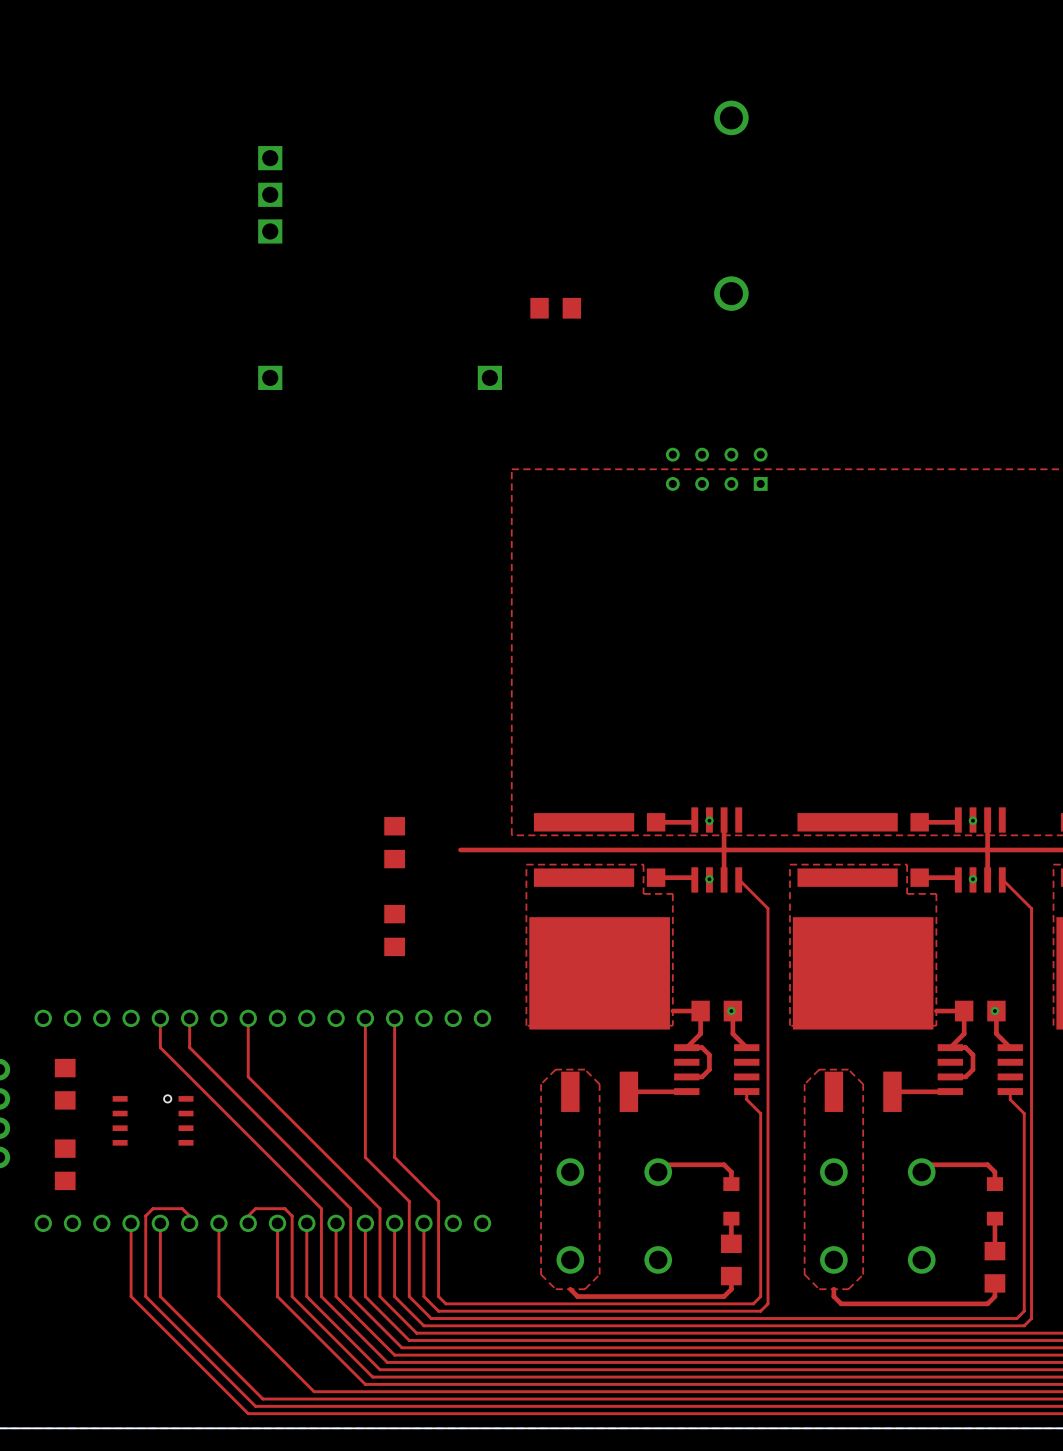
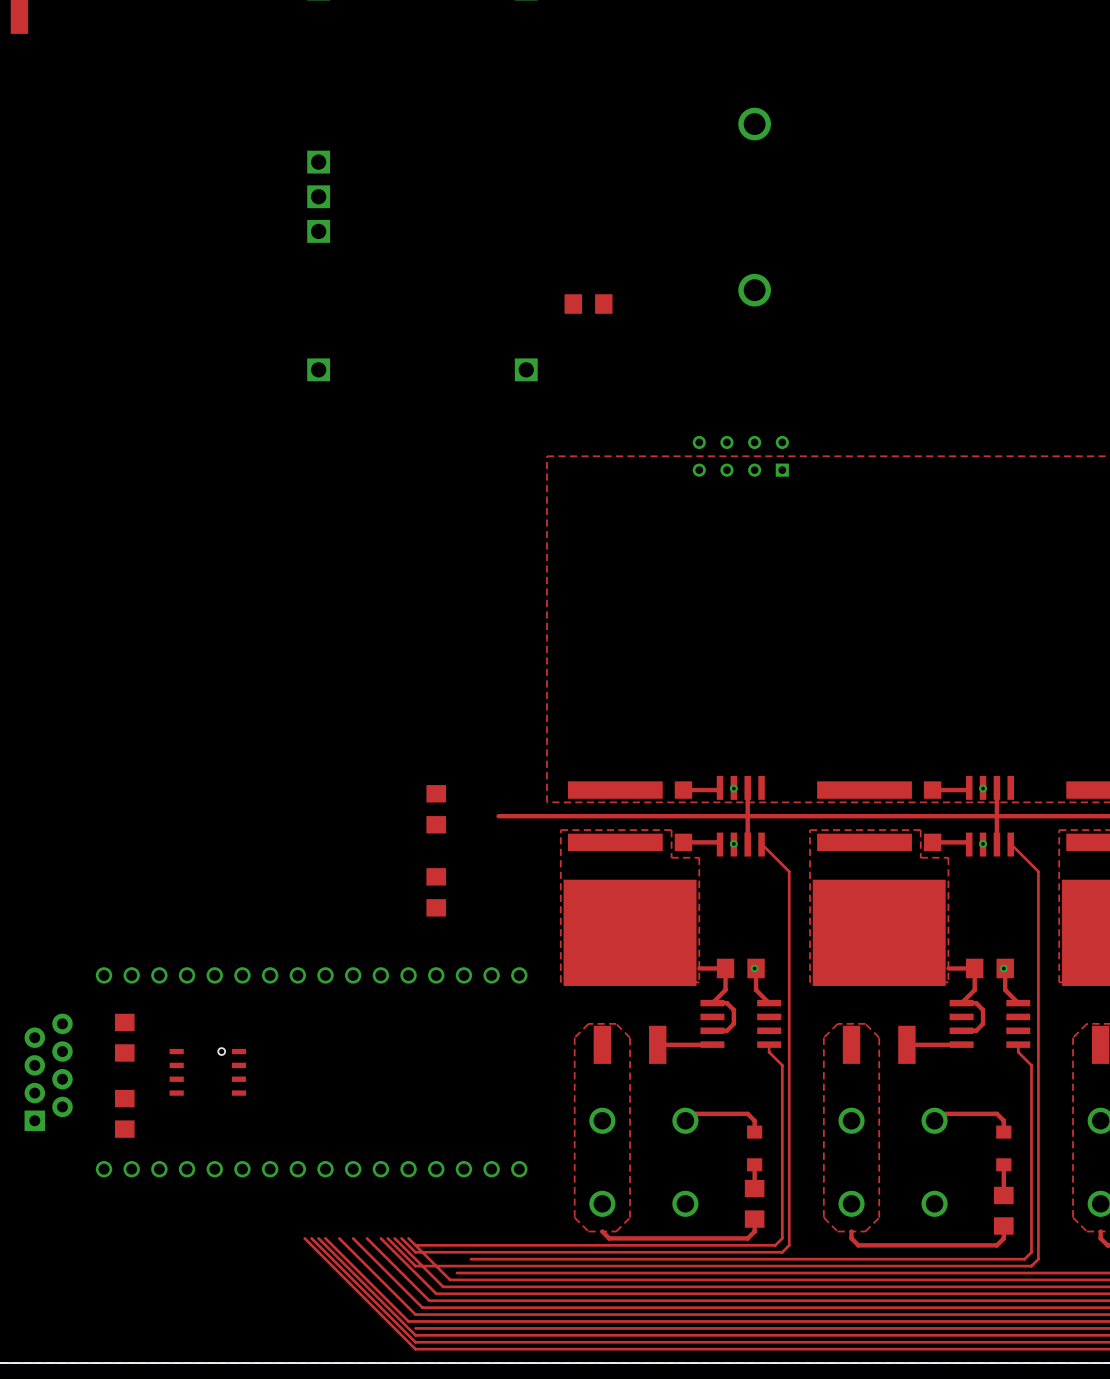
top track: (160, 1018) (160, 1047) (321, 1208) (321, 1296) -> none
top track: (189, 1018) (189, 1047) (350, 1208) (350, 1296) -> none
top track: (248, 1018) (248, 1076) (380, 1208) (380, 1296) (416, 1333) -> none
top track: (365, 1018) (365, 1157) (409, 1201) (409, 1296) (431, 1318) -> none
top track: (394, 1018) (394, 1157) (438, 1201) (438, 1296) (445, 1303) -> (415, 1245) (484, 1245)
top track: (131, 1223) (131, 1296) (248, 1413) (372, 1413) -> (304, 1238) (415, 1349)
top track: (160, 1223) (160, 1296) (262, 1399) (372, 1399) -> (318, 1238) (415, 1335)
top track: (189, 1223) (189, 1216) (182, 1208) (153, 1208) (145, 1216) (145, 1296) (255, 1406) (372, 1406) -> (311, 1238) (415, 1342)
top track: (218, 1223) (218, 1296) (314, 1391) (372, 1391) -> none
top track: (248, 1223) (248, 1216) (255, 1208) (284, 1208) (292, 1216) (292, 1296) -> none
top track: (277, 1223) (277, 1296) -> none
top track: (306, 1223) (306, 1296) -> none
top track: (336, 1223) (336, 1296) -> none
top track: (365, 1223) (365, 1296) -> none
top track: (394, 1223) (394, 1296) (423, 1325) -> (387, 1238) (415, 1266) (463, 1266)
top track: (423, 1223) (423, 1296) (438, 1311) -> (401, 1238) (415, 1252) (477, 1252)

